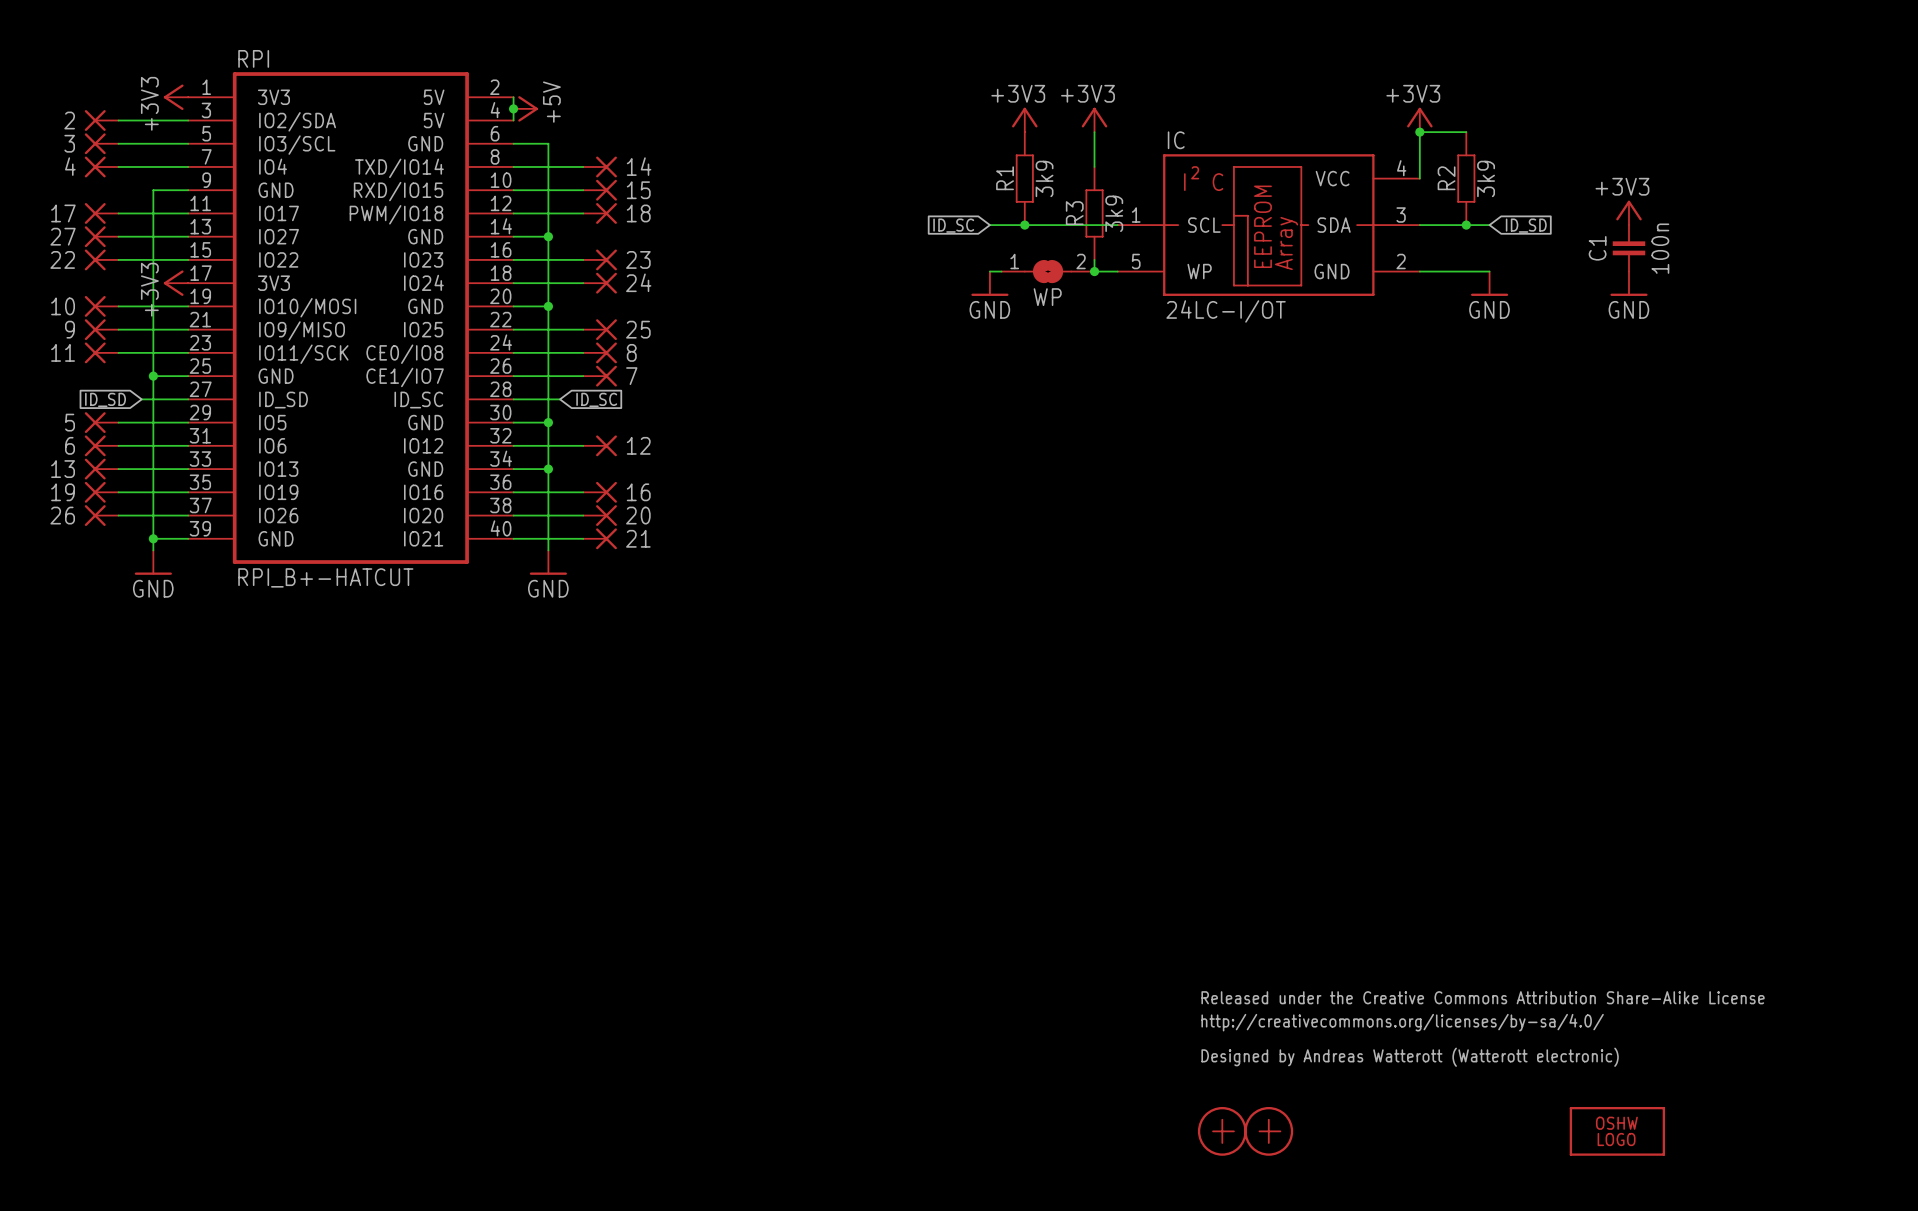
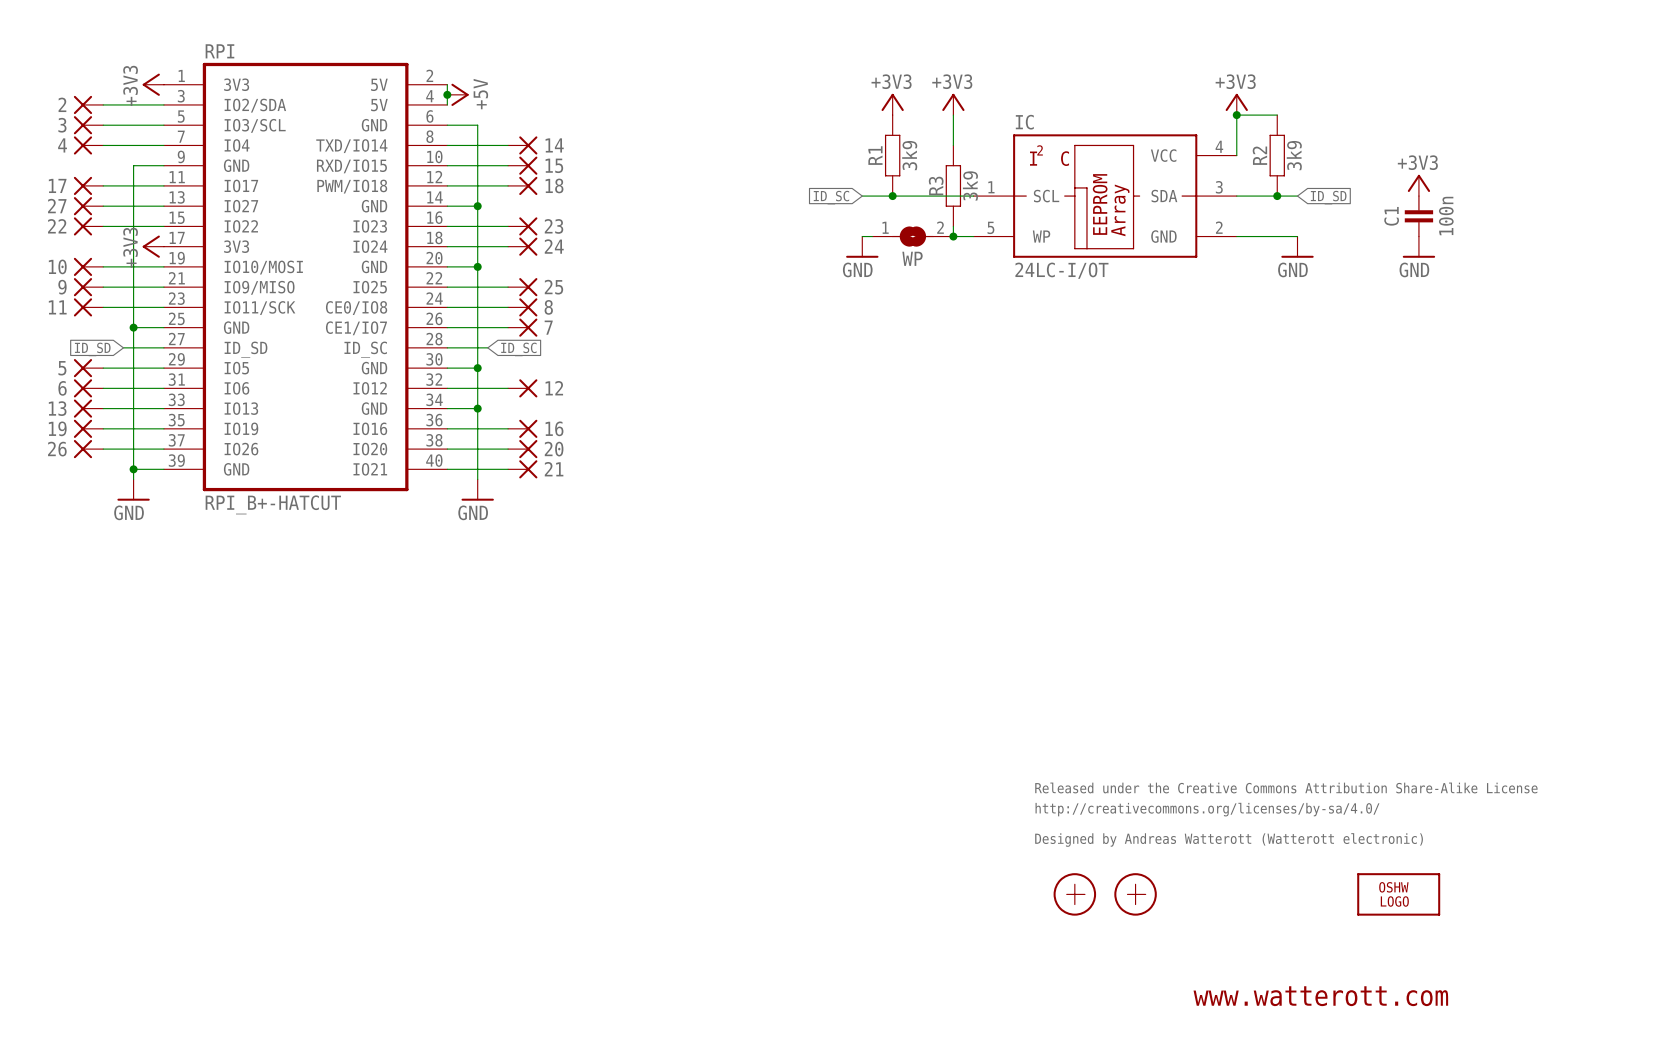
text position: Released under the Creative Commons Attribution Share-Alike License (1483, 997) -> Released under the Creative Commons Attribution Share-Alike License (1286, 787)
text position: http://creativecommons.org/licenses/by-sa/4.0/ (1402, 1022) -> http://creativecommons.org/licenses/by-sa/4.0/ (1207, 809)
part: none -> (1074, 894)
part: none -> (1135, 894)
text position: Designed by Andreas Watterott (Watterott electronic) (1410, 1057) -> Designed by Andreas Watterott (Watterott electronic) (1229, 839)
part: (1222, 1131) -> none
part: (1268, 1131) -> none
part position: (1617, 1131) -> (1398, 894)
text: none -> www.watterott.com (1320, 996)

